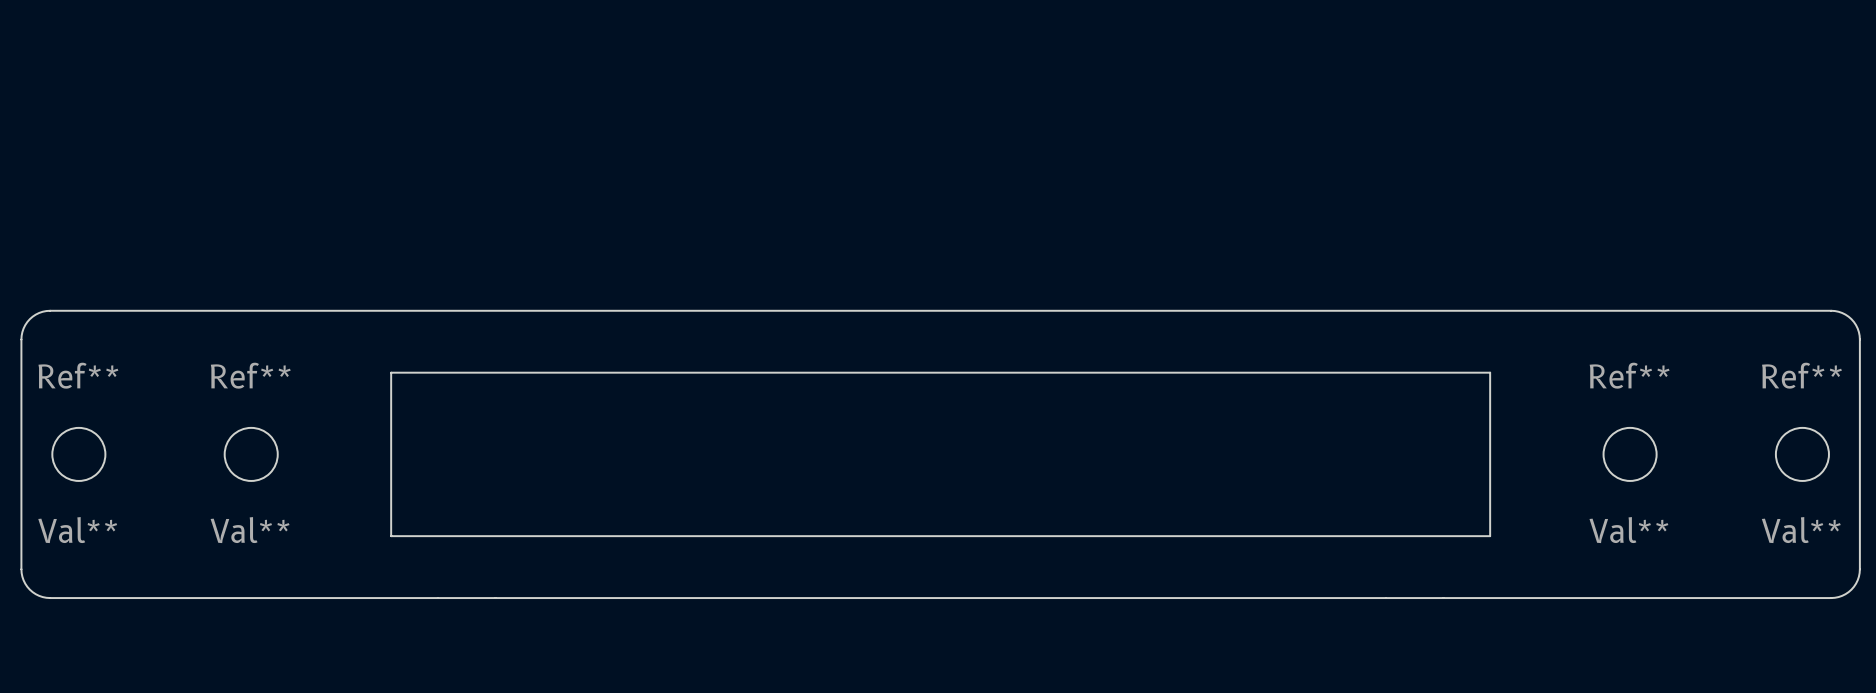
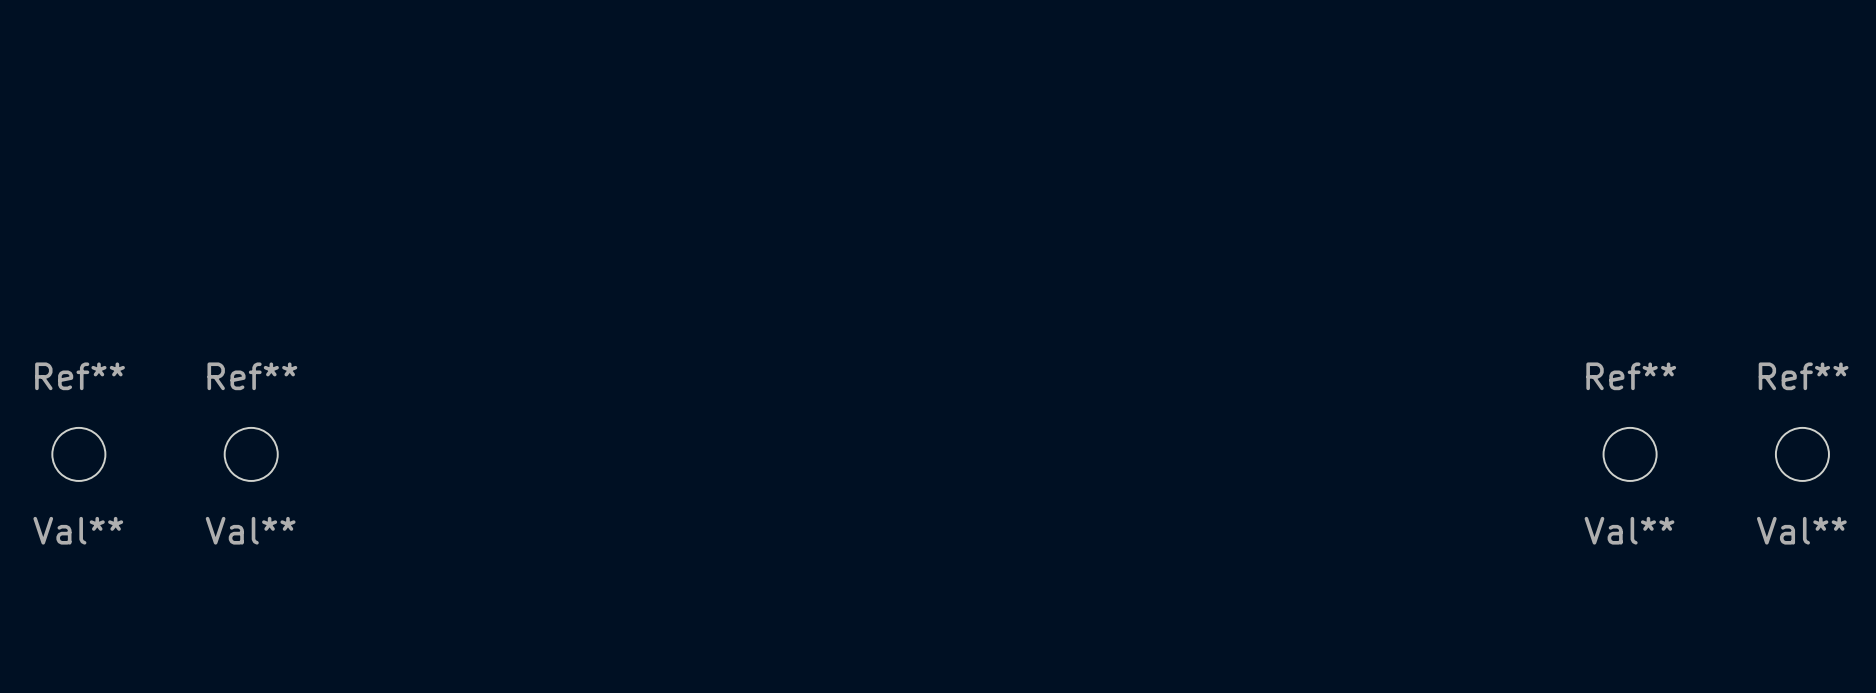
board edge: (50, 310) (1834, 311) (1851, 319) (1859, 335) (1859, 573) (1851, 589) (1842, 595) (1831, 598) (46, 597) (29, 589) (21, 573) (21, 339) (23, 328) (29, 319) (39, 312) (50, 310) -> none
drawing: [390, 372, 1491, 537] -> none

